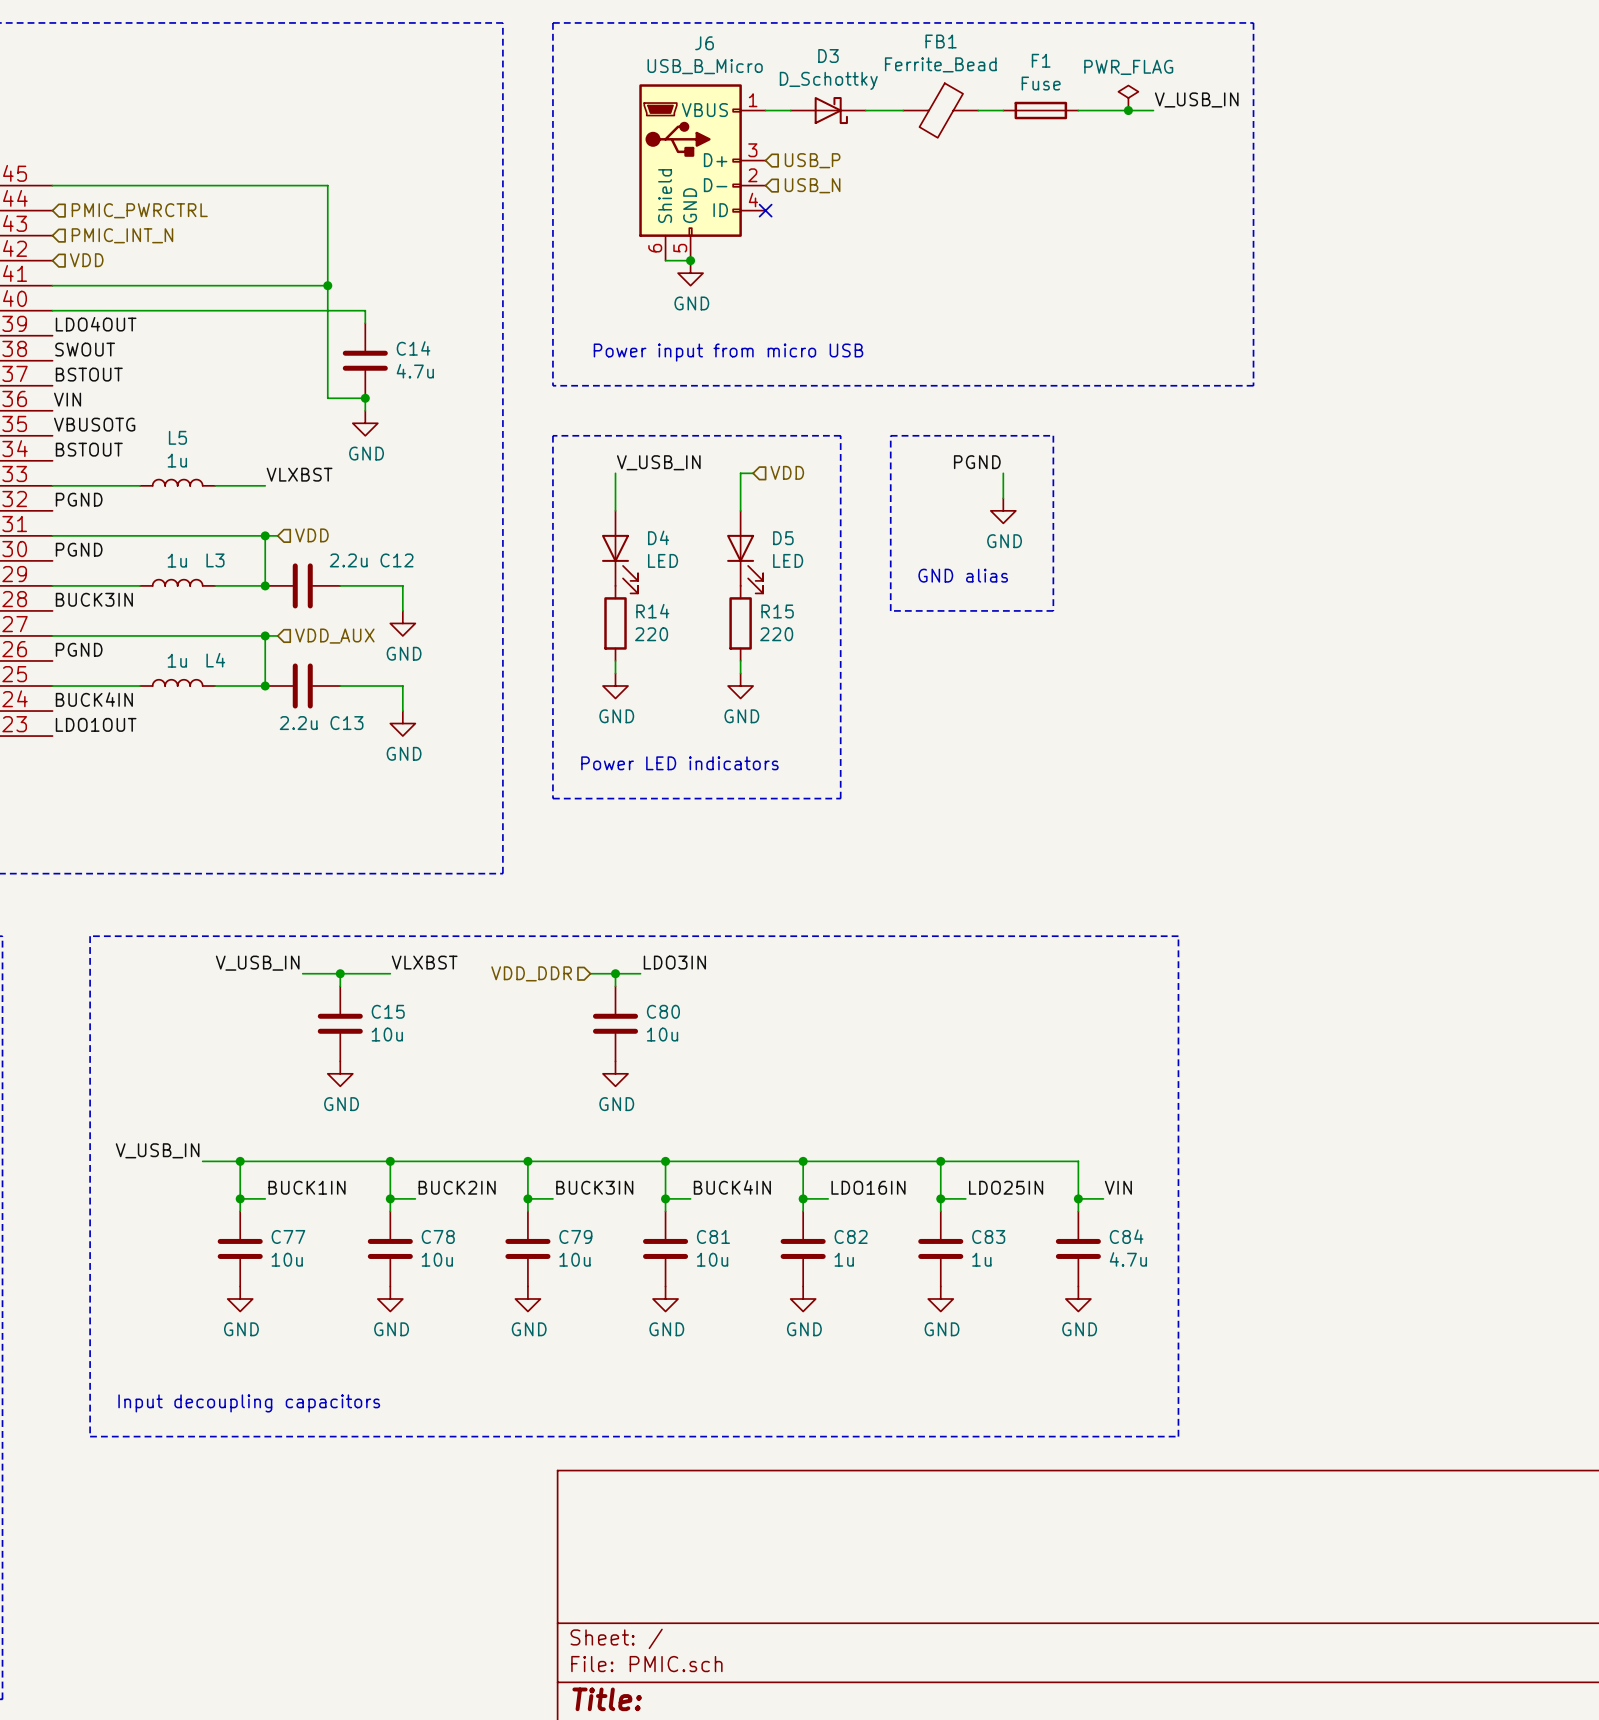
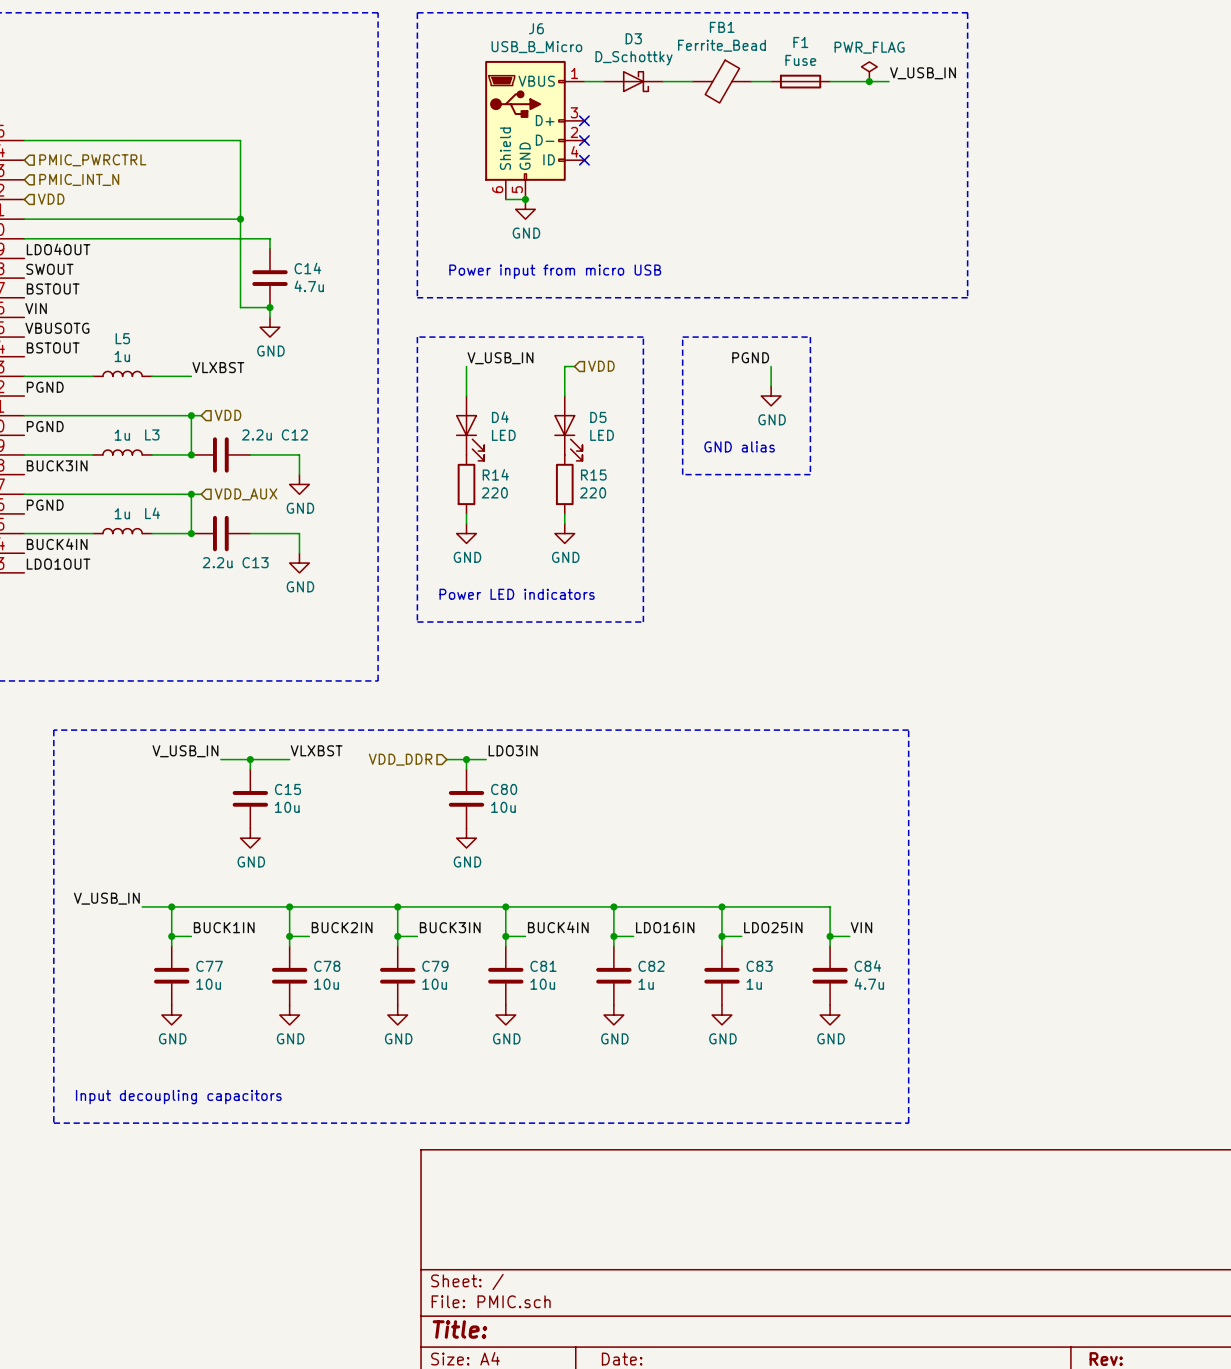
no-connect mark: none -> (584, 120)
hierarchical label: USB_P (812, 160) -> none
no-connect mark: none -> (584, 140)
hierarchical label: USB_N (812, 185) -> none

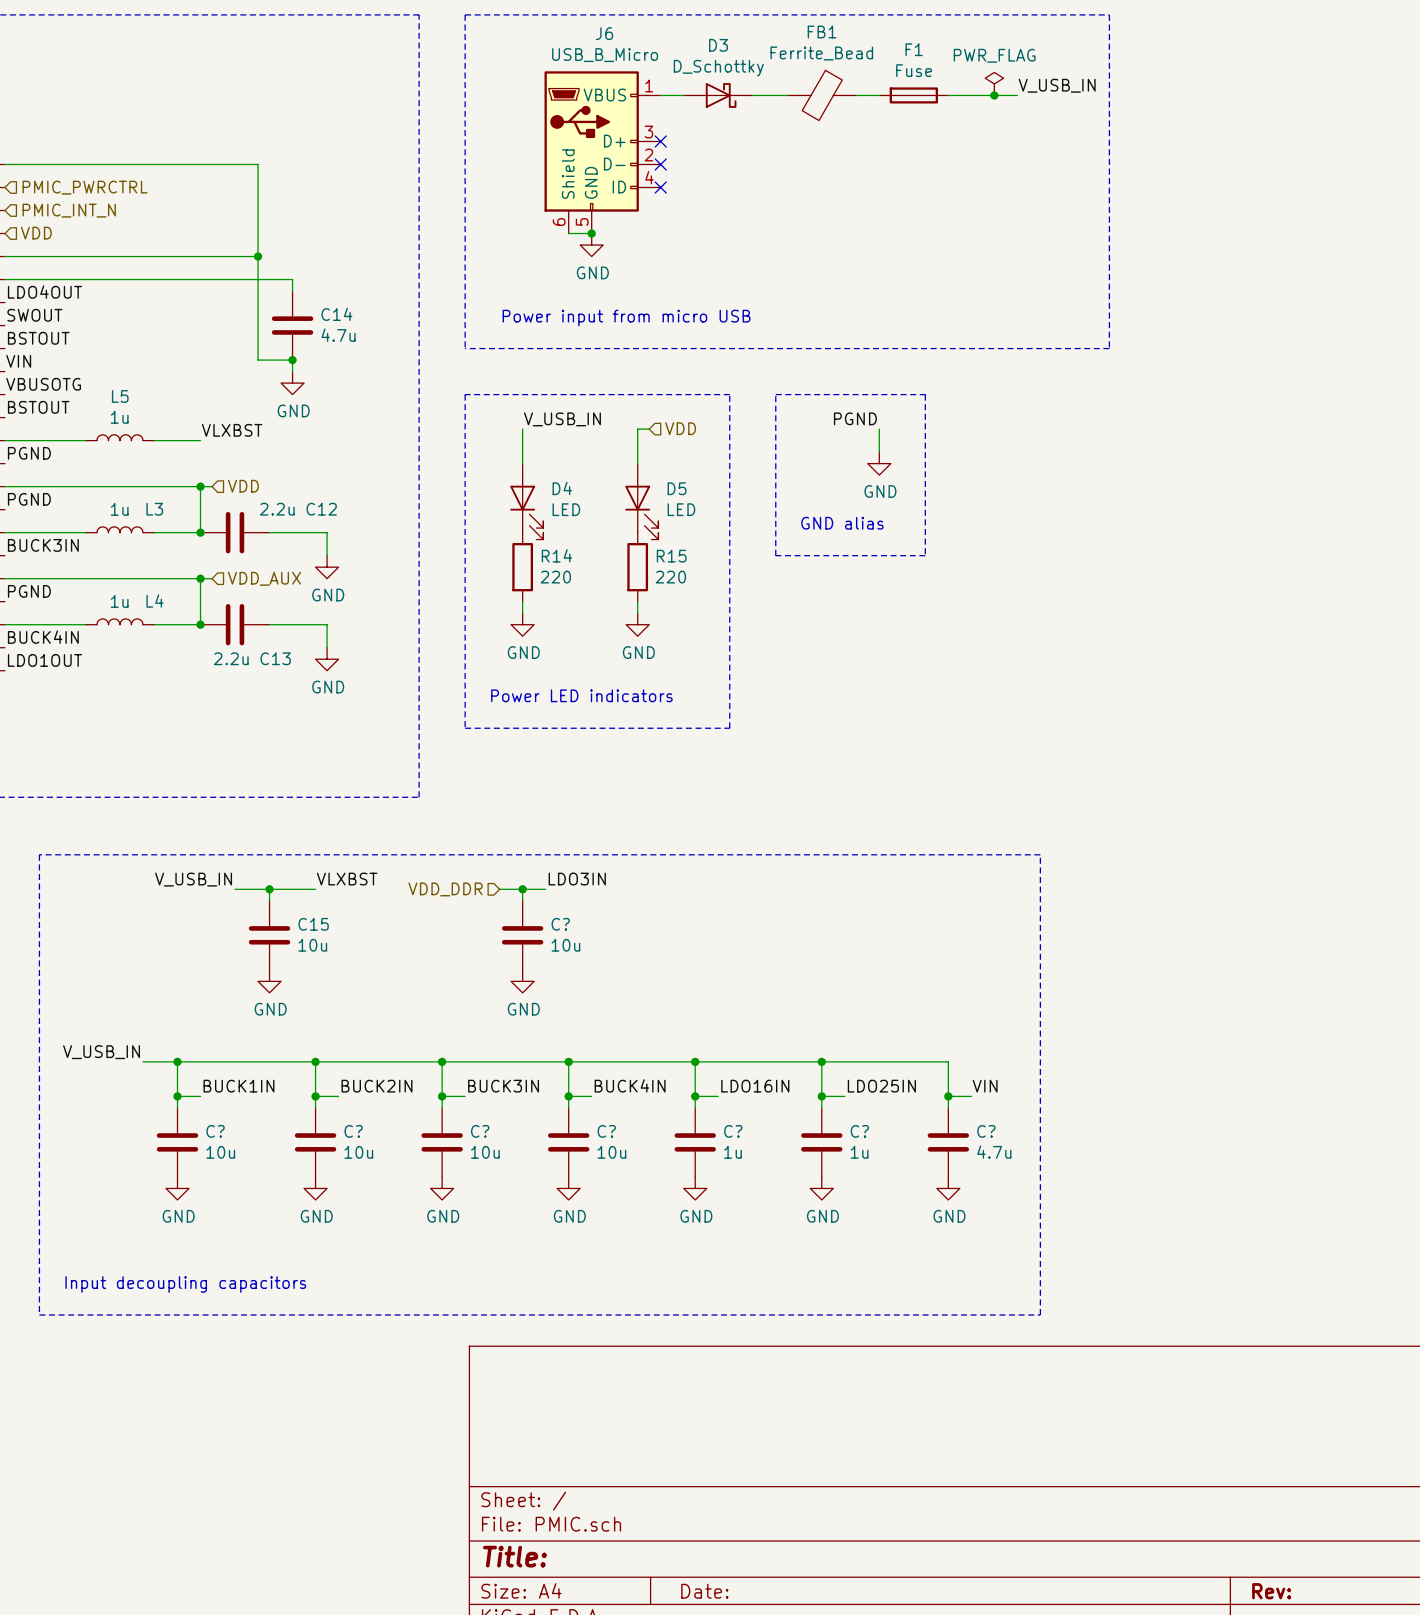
C80 name: C80 (504, 789) -> C? (560, 924)
C77 name: C77 (209, 966) -> C? (215, 1131)
C78 name: C78 (327, 966) -> C? (353, 1131)
C79 name: C79 (435, 966) -> C? (480, 1131)
C81 name: C81 (543, 966) -> C? (606, 1131)
C82 name: C82 (651, 966) -> C? (733, 1131)
C83 name: C83 (759, 966) -> C? (859, 1131)
C84 name: C84 (867, 966) -> C? (986, 1131)

